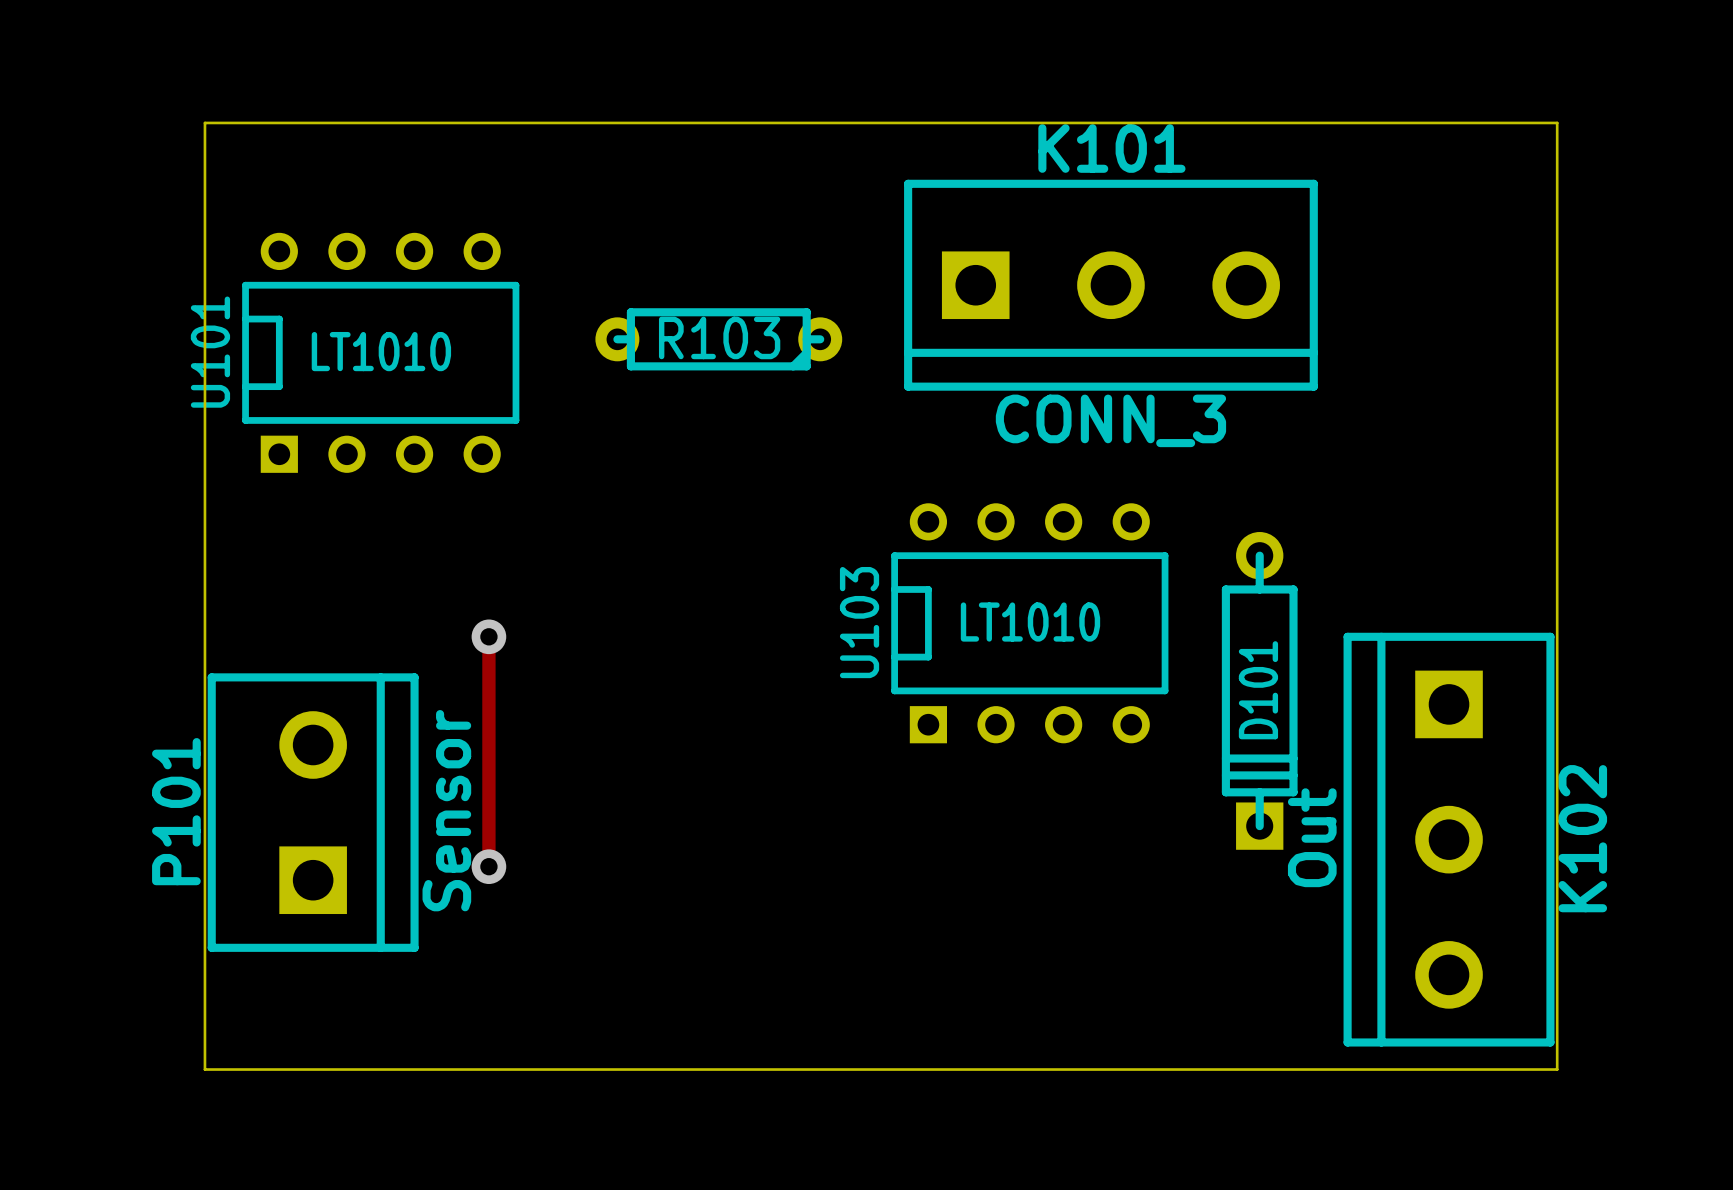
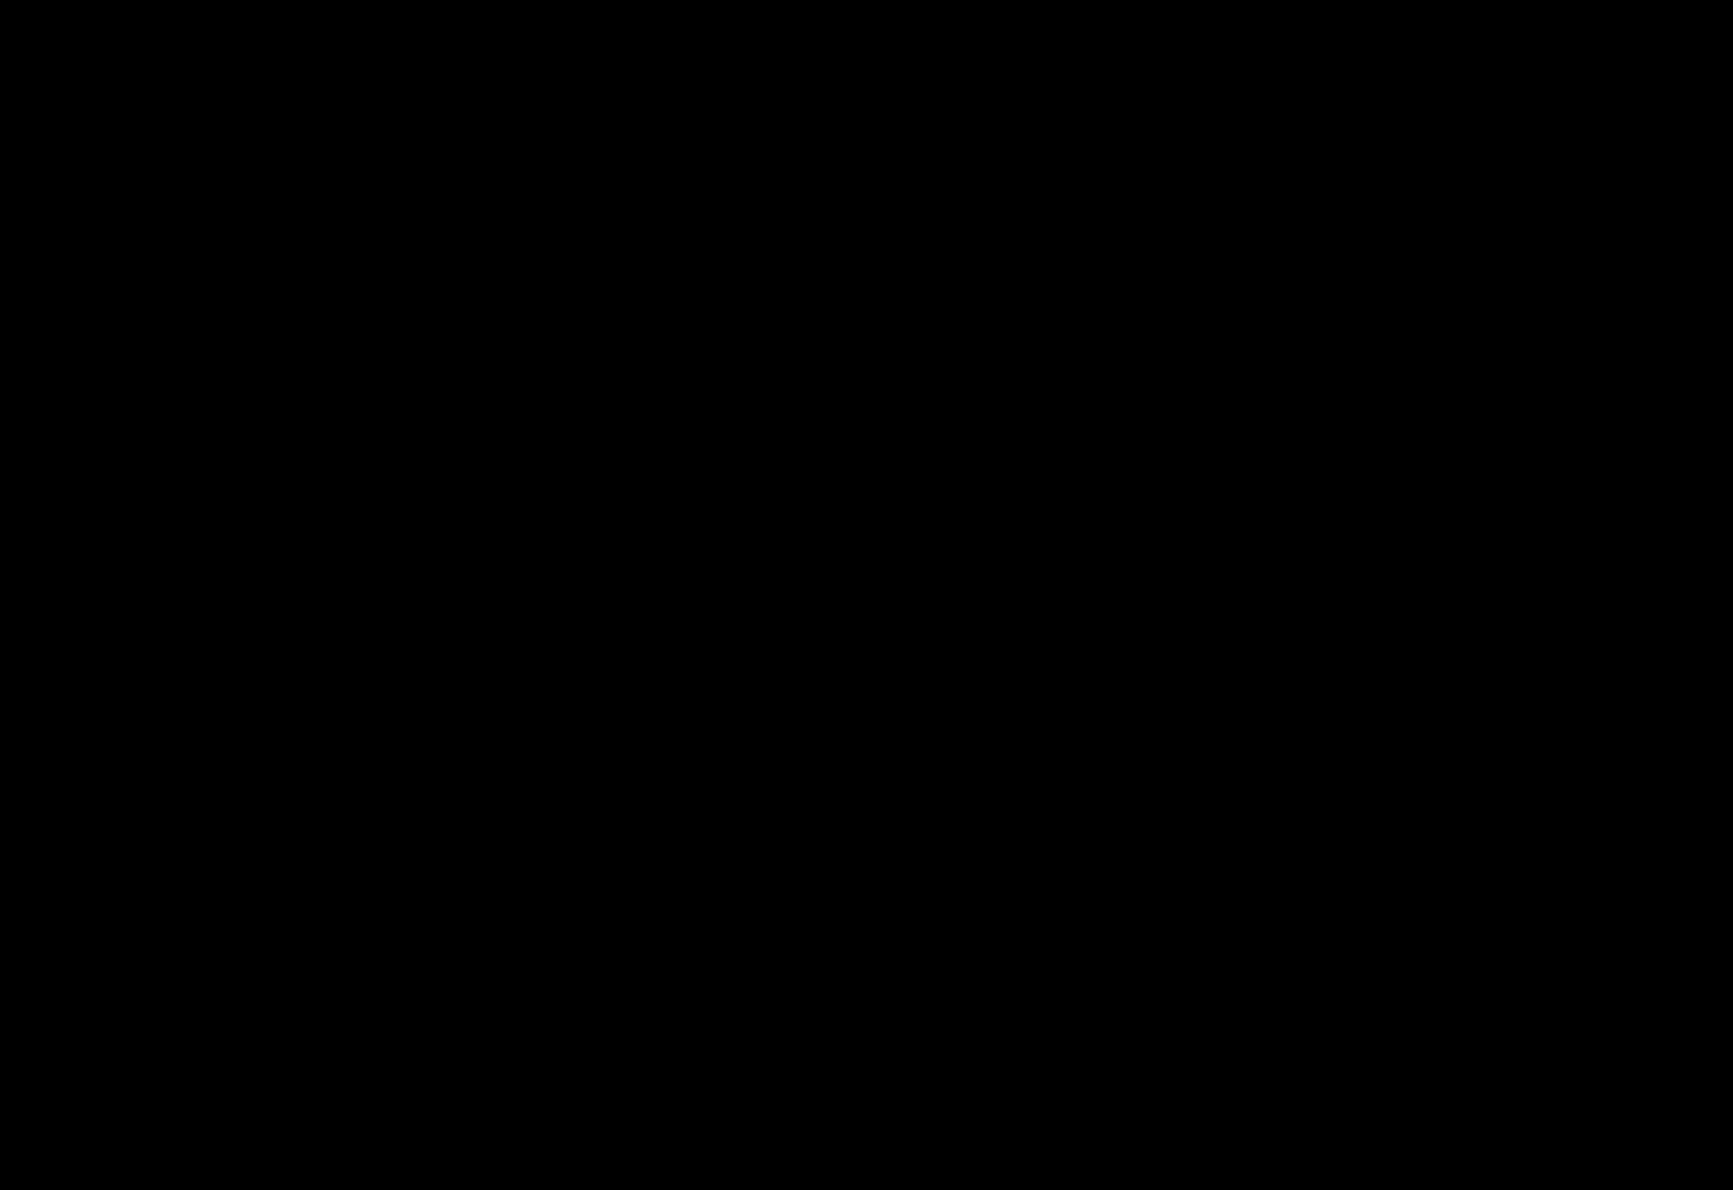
board edge: (204, 122) (204, 1069) (1557, 1069) (1557, 122) (204, 122) -> none
K101: CONN_3 (1110, 285) -> none
R103: (718, 339) -> none
U101: LT1010 (380, 352) -> none
U103: LT1010 (1029, 623) -> none
track: (488, 636) (488, 866) -> none
via: (488, 636) -> none
D101: (1259, 690) -> none
P101: Sensor (313, 812) -> none
K102: Out (1449, 839) -> none
via: (488, 866) -> none

